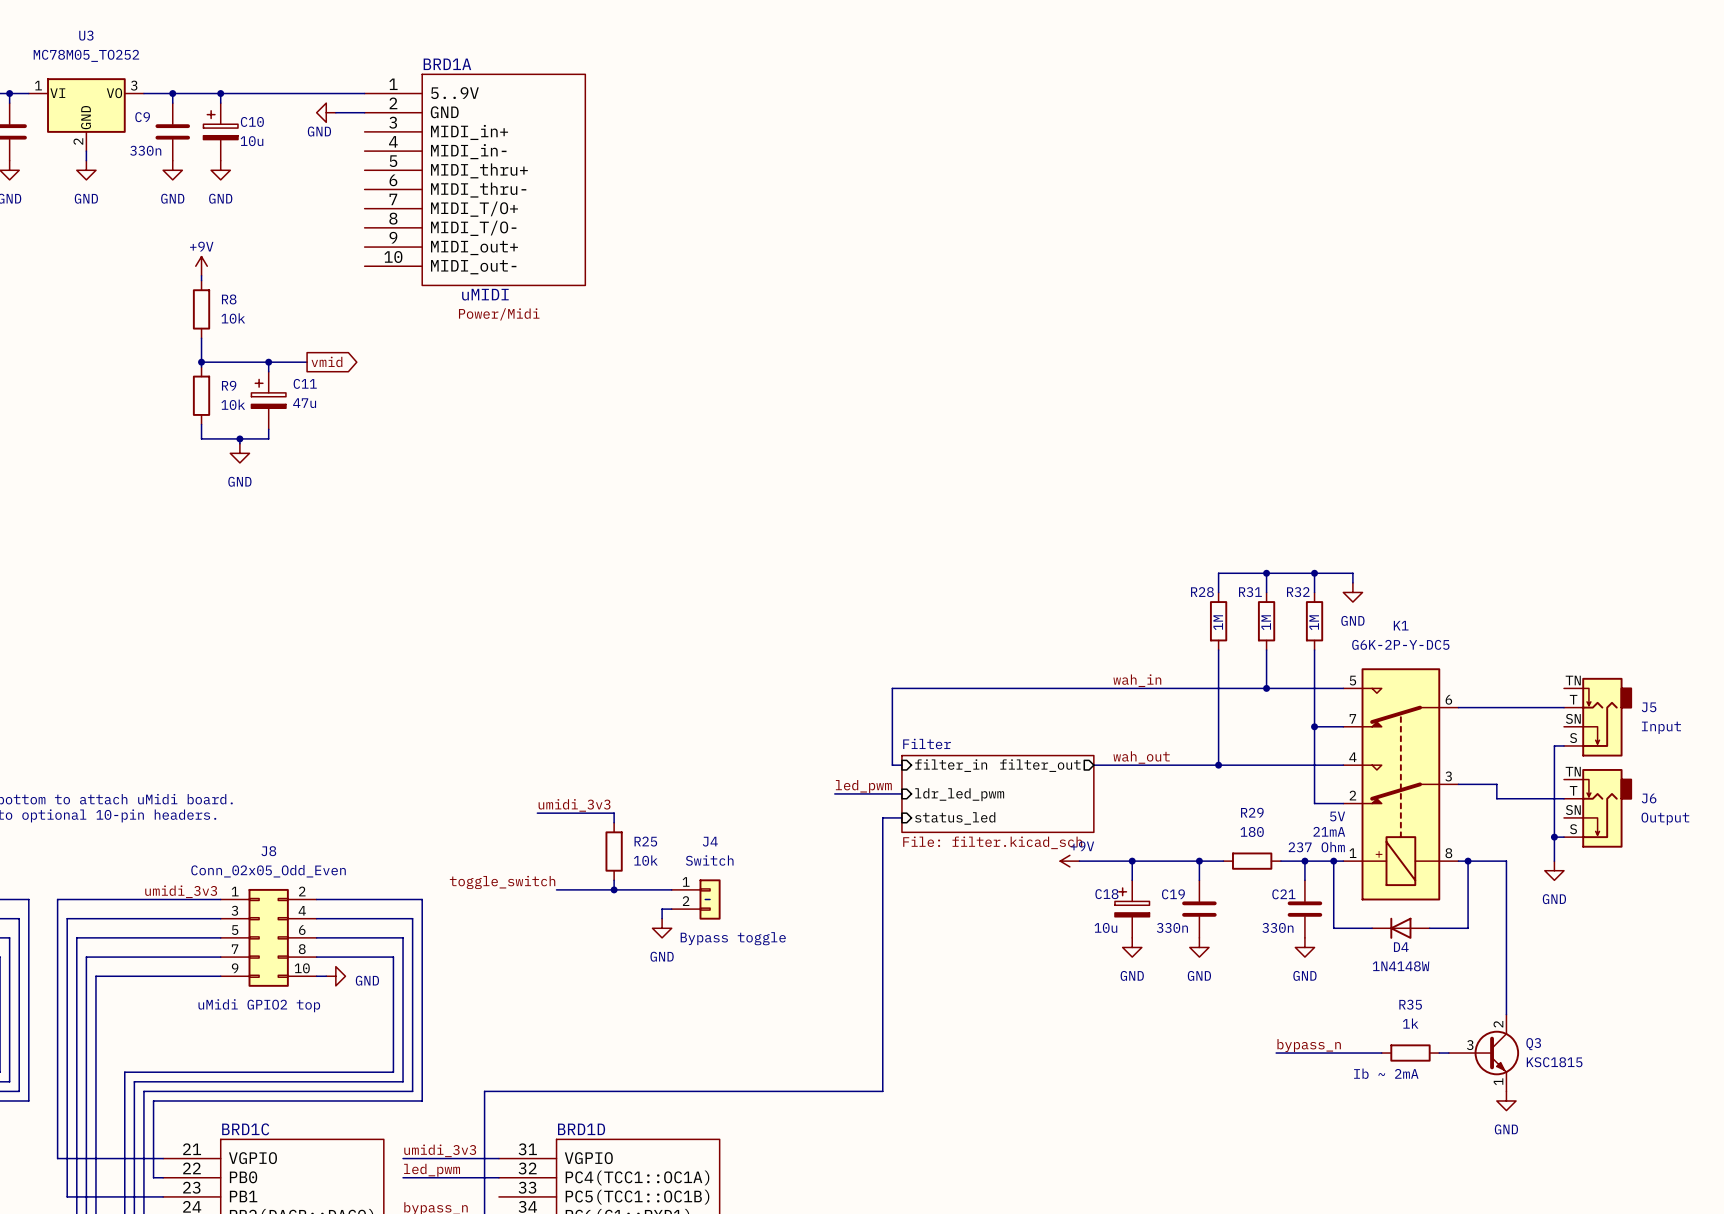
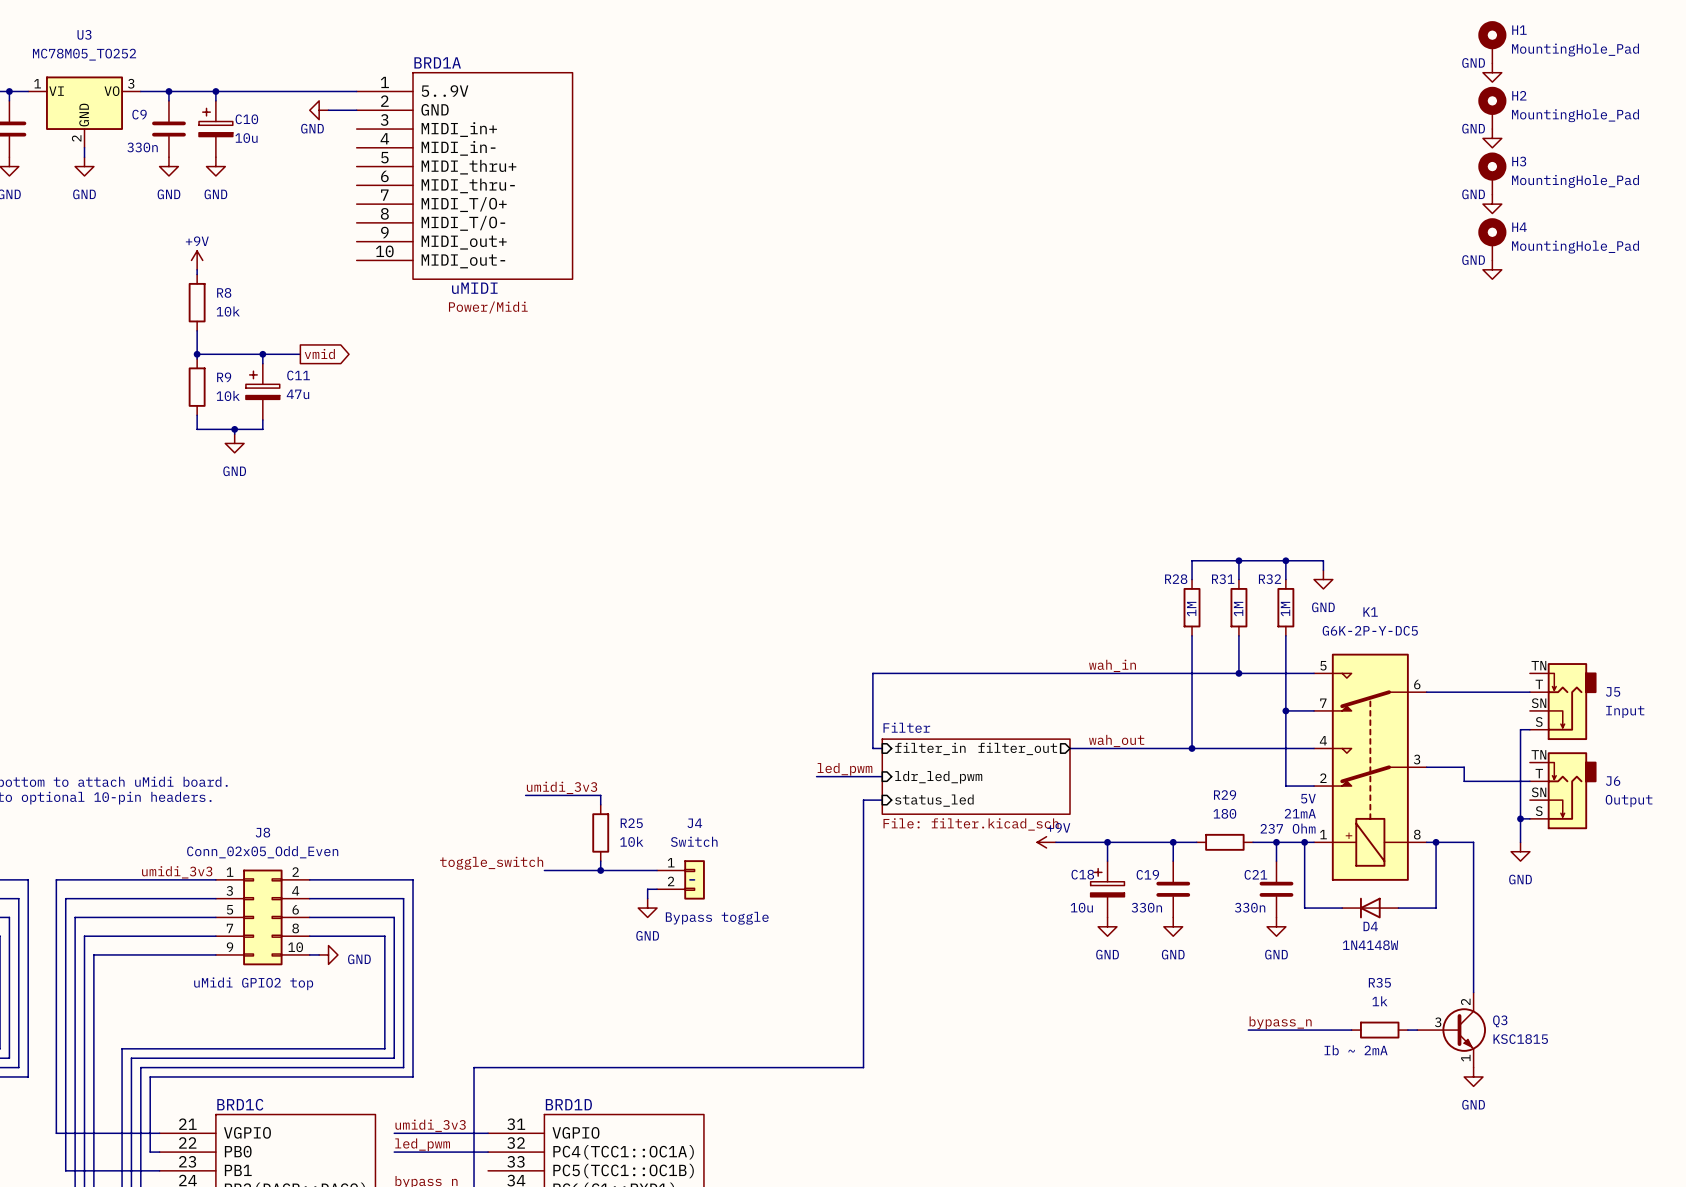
H1: none -> MountingHole_Pad (1492, 42)
power symbol: none -> GND (1492, 72)
H2: none -> MountingHole_Pad (1492, 107)
power symbol: none -> GND (1492, 138)
H3: none -> MountingHole_Pad (1492, 173)
power symbol: none -> GND (1492, 204)
H4: none -> MountingHole_Pad (1492, 239)
power symbol: none -> GND (1492, 269)

